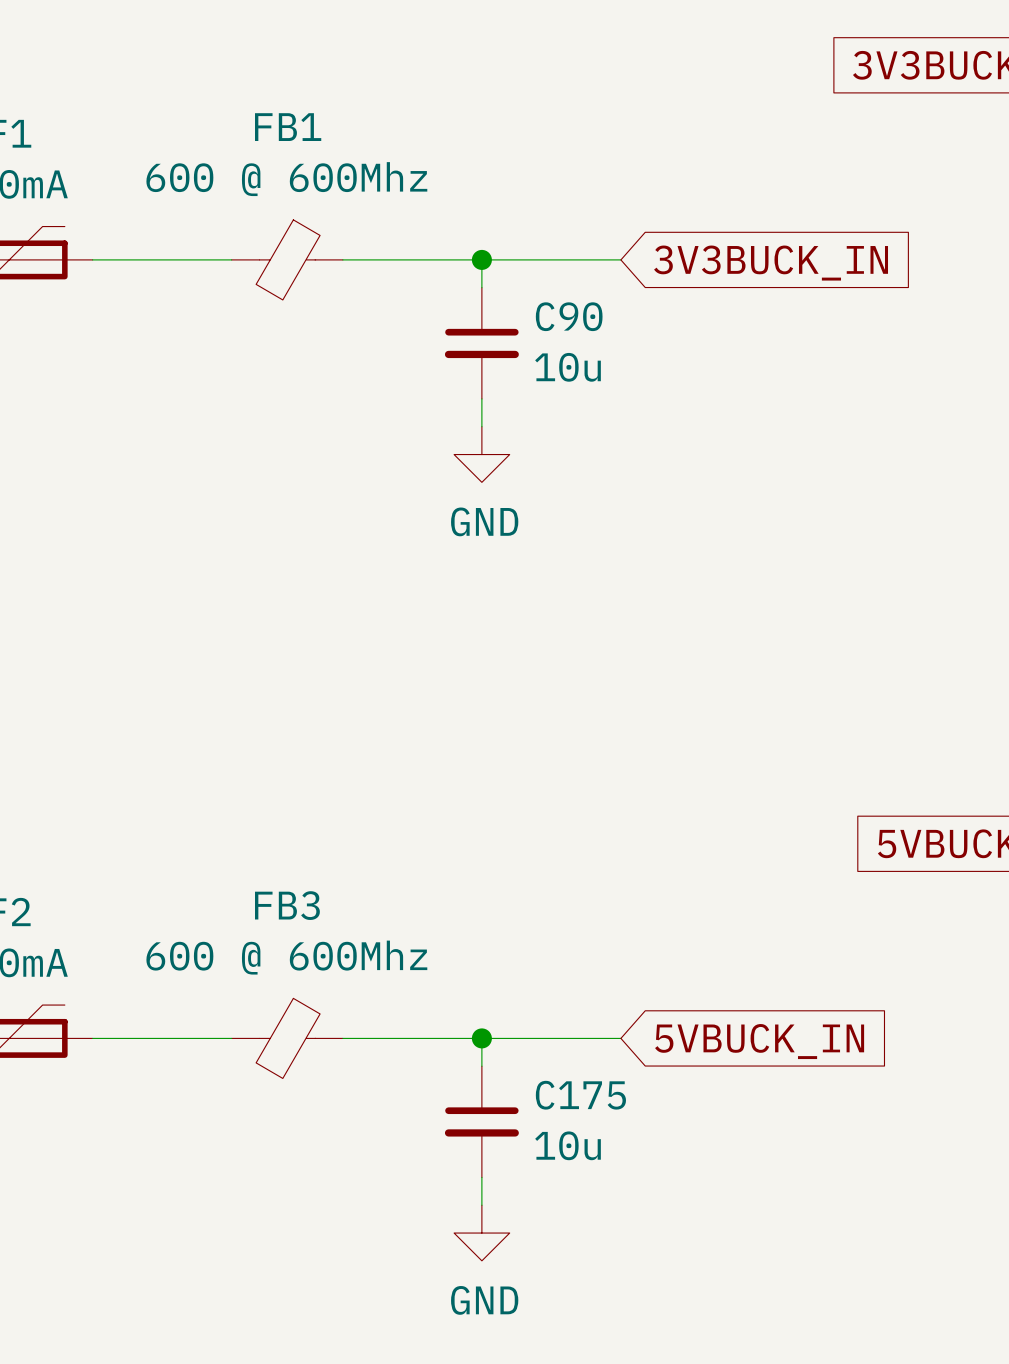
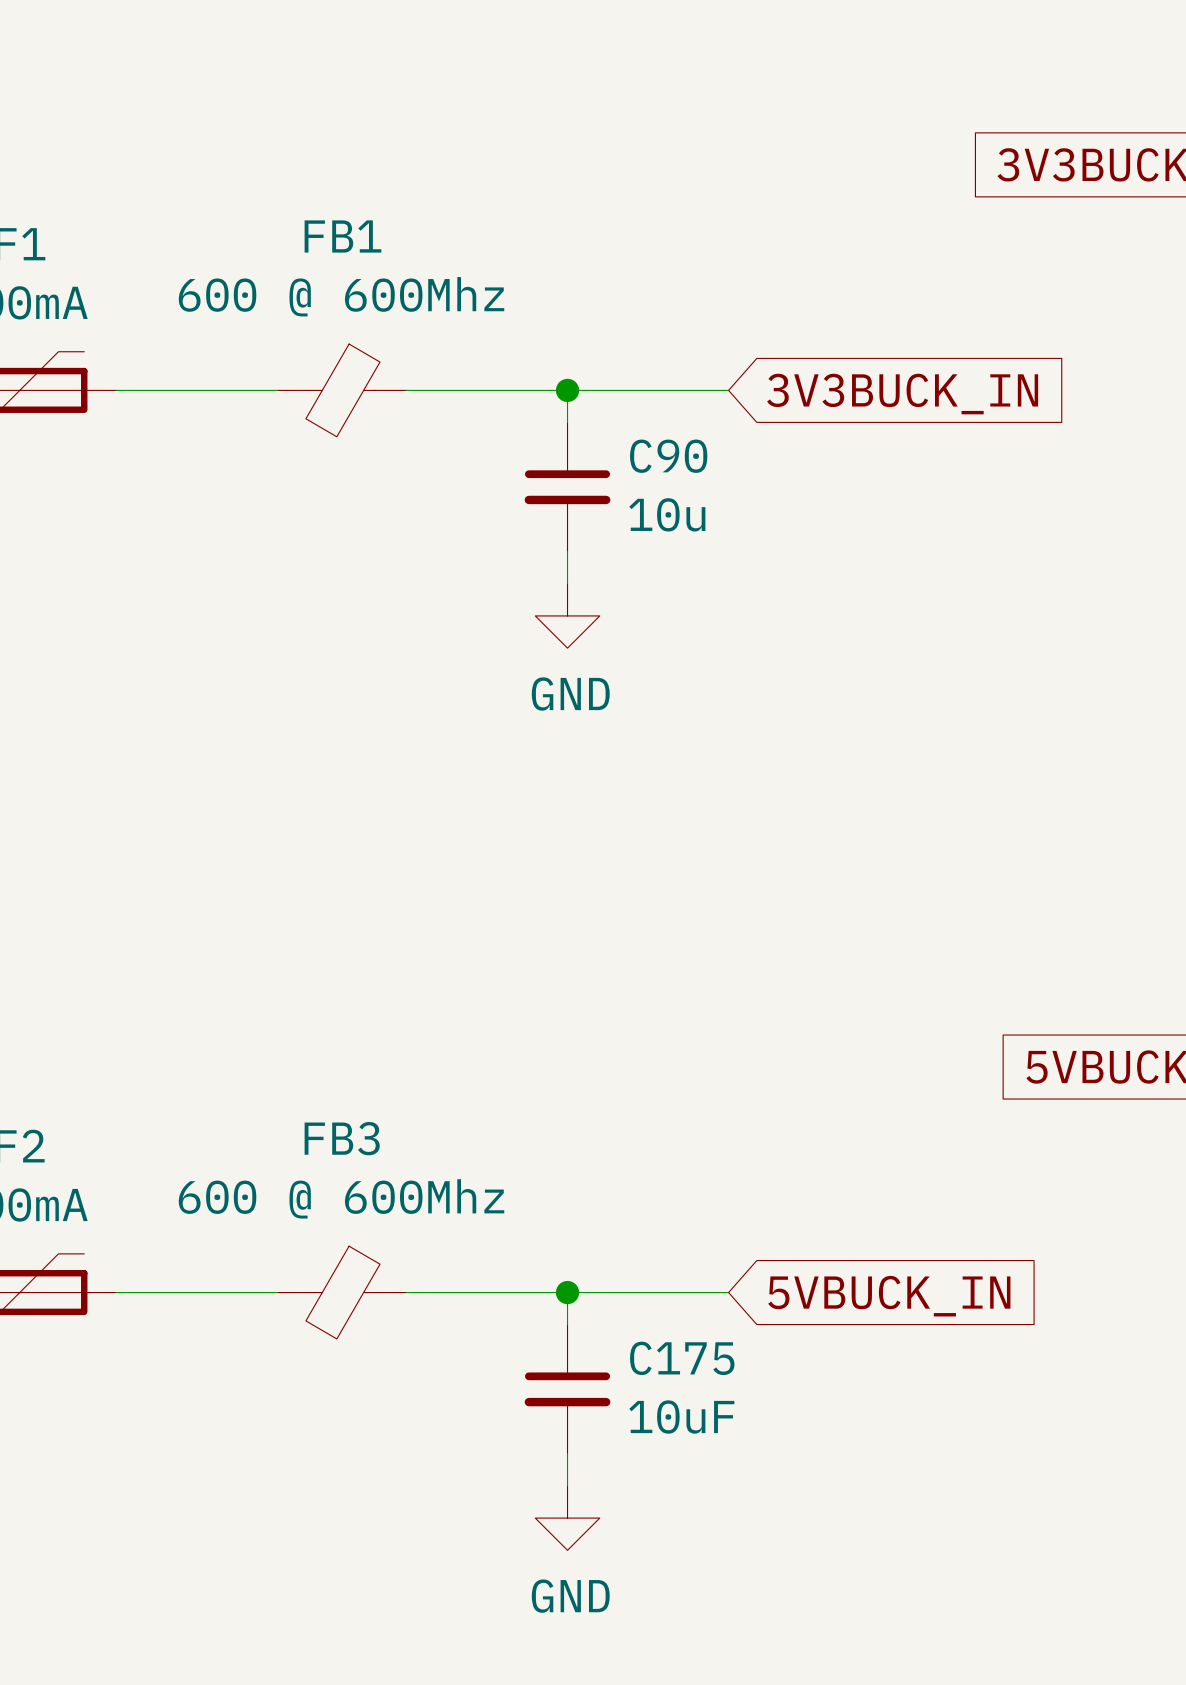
C175 value: 10u (568, 1145) -> 10uF (681, 1417)

